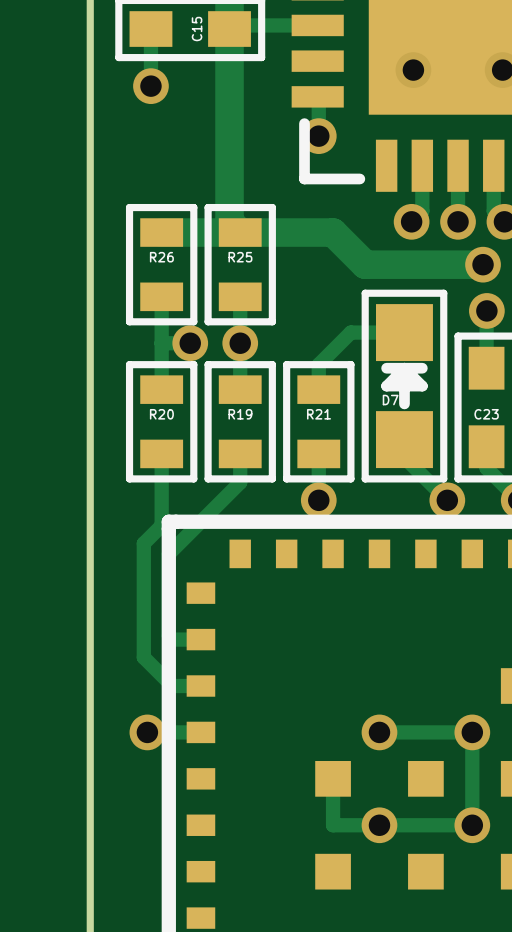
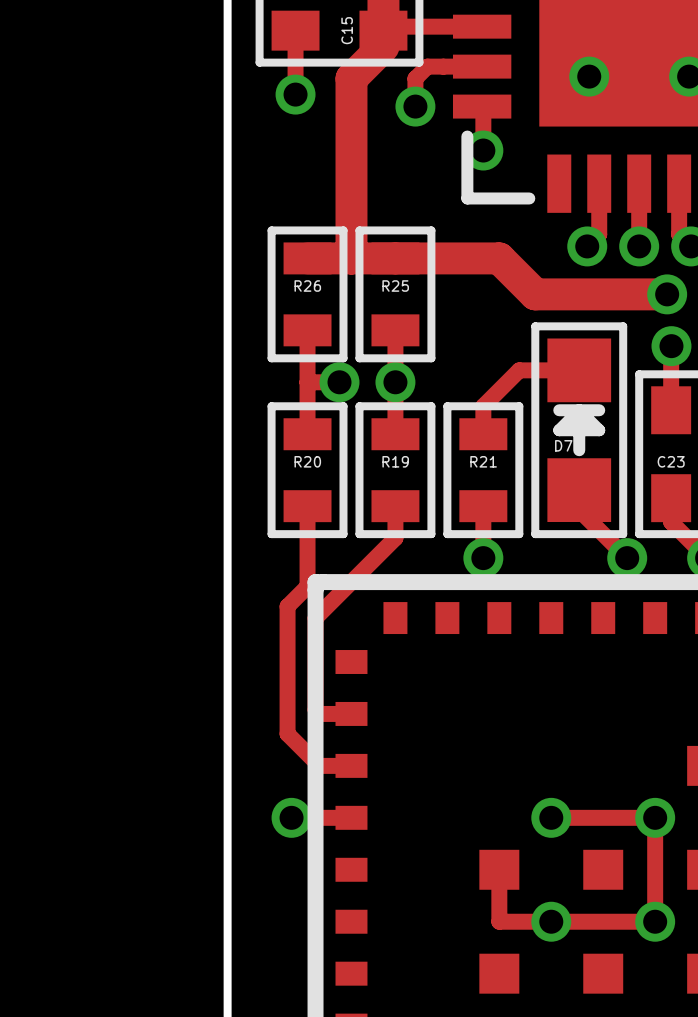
track: (229, 43) (229, 221) (240, 232) -> (383, 46) (351, 78) (351, 258)
track: none -> (482, 66) (427, 66) (415, 78) (415, 106)
via: none -> (415, 106)

